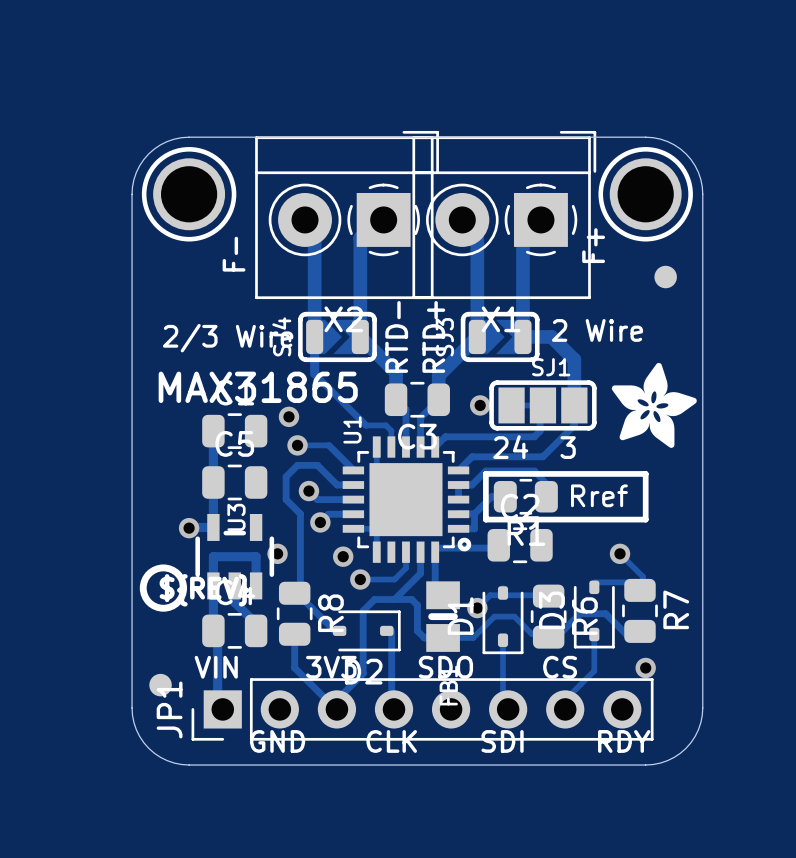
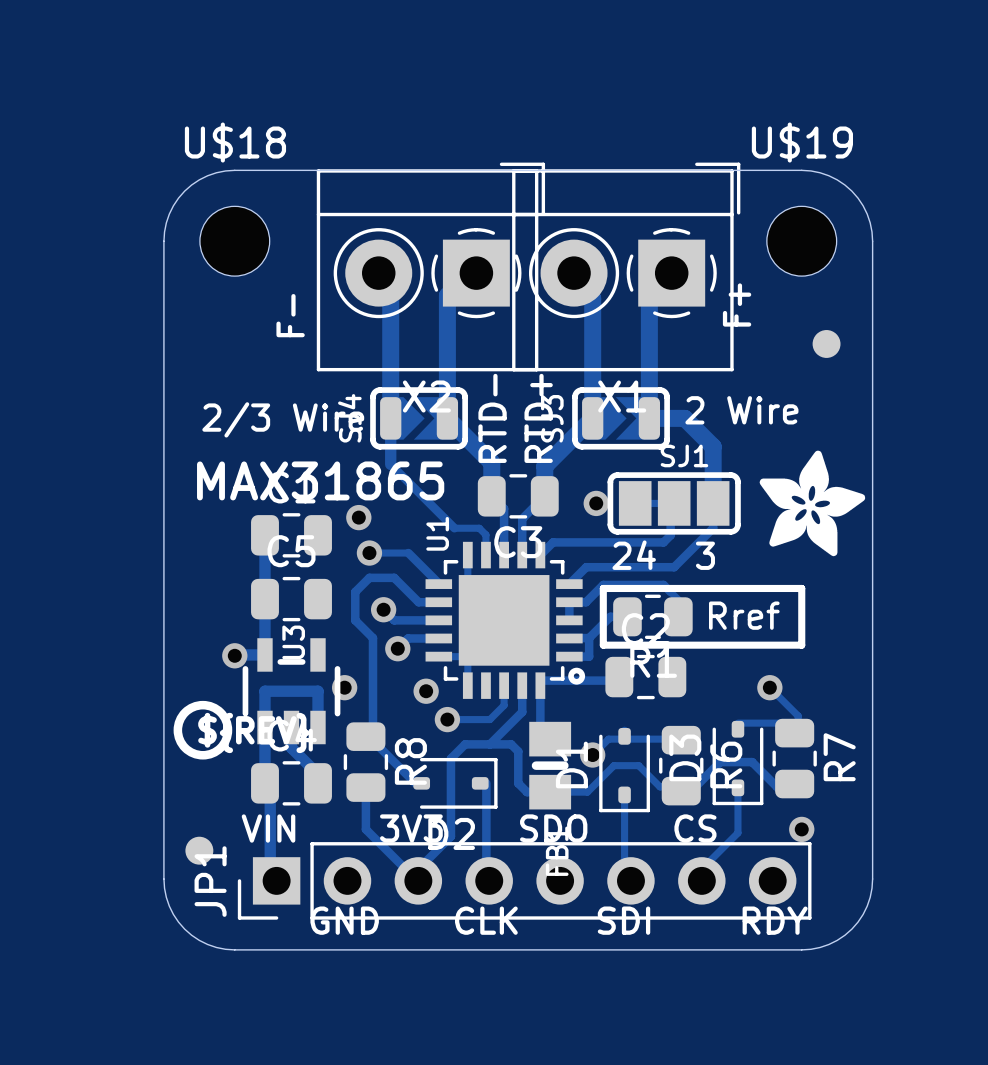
part: (189, 194) -> none
U$18: none -> (234, 241)
part: (645, 194) -> none
U$19: none -> (801, 241)

